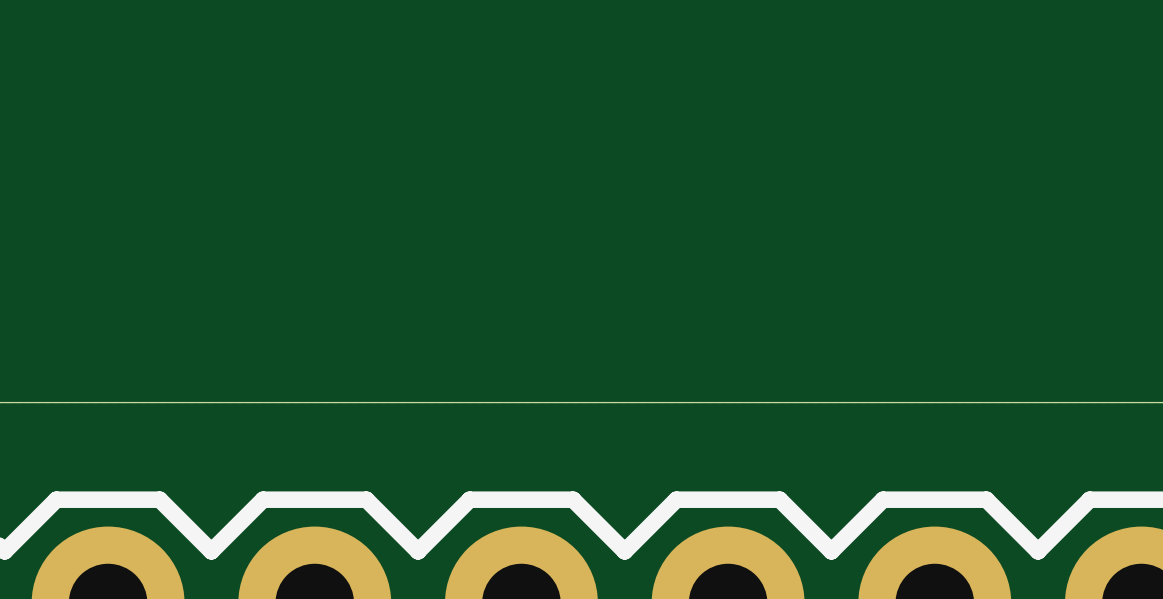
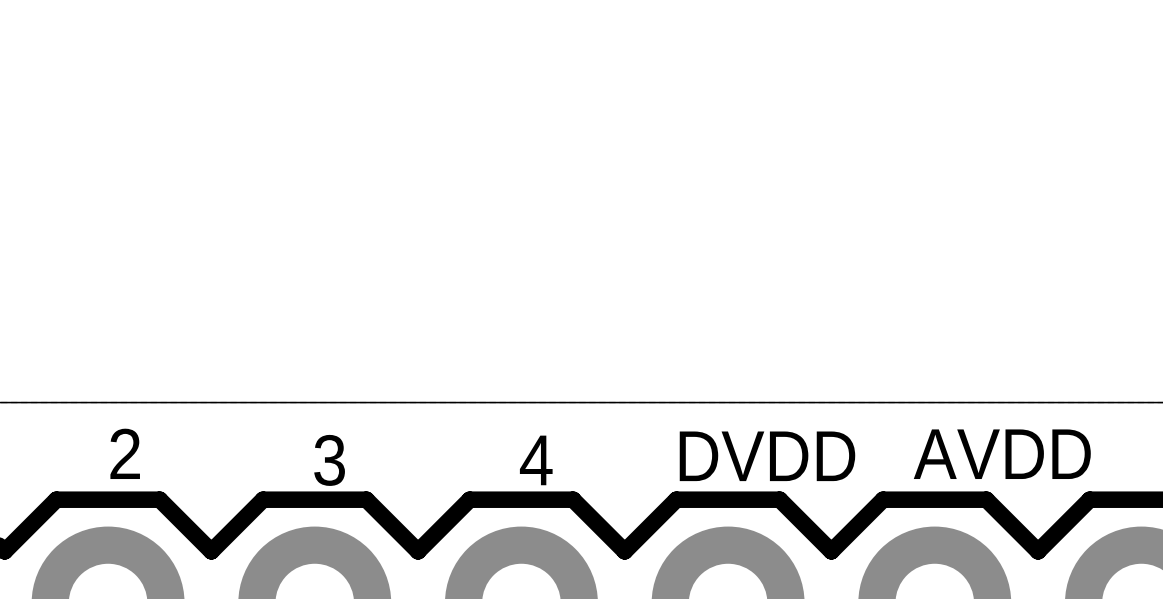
text: none -> 2 (125, 453)
text: none -> AVDD (1002, 454)
text: none -> DVDD (767, 456)
text: none -> 3 (329, 460)
text: none -> 4 (536, 460)

